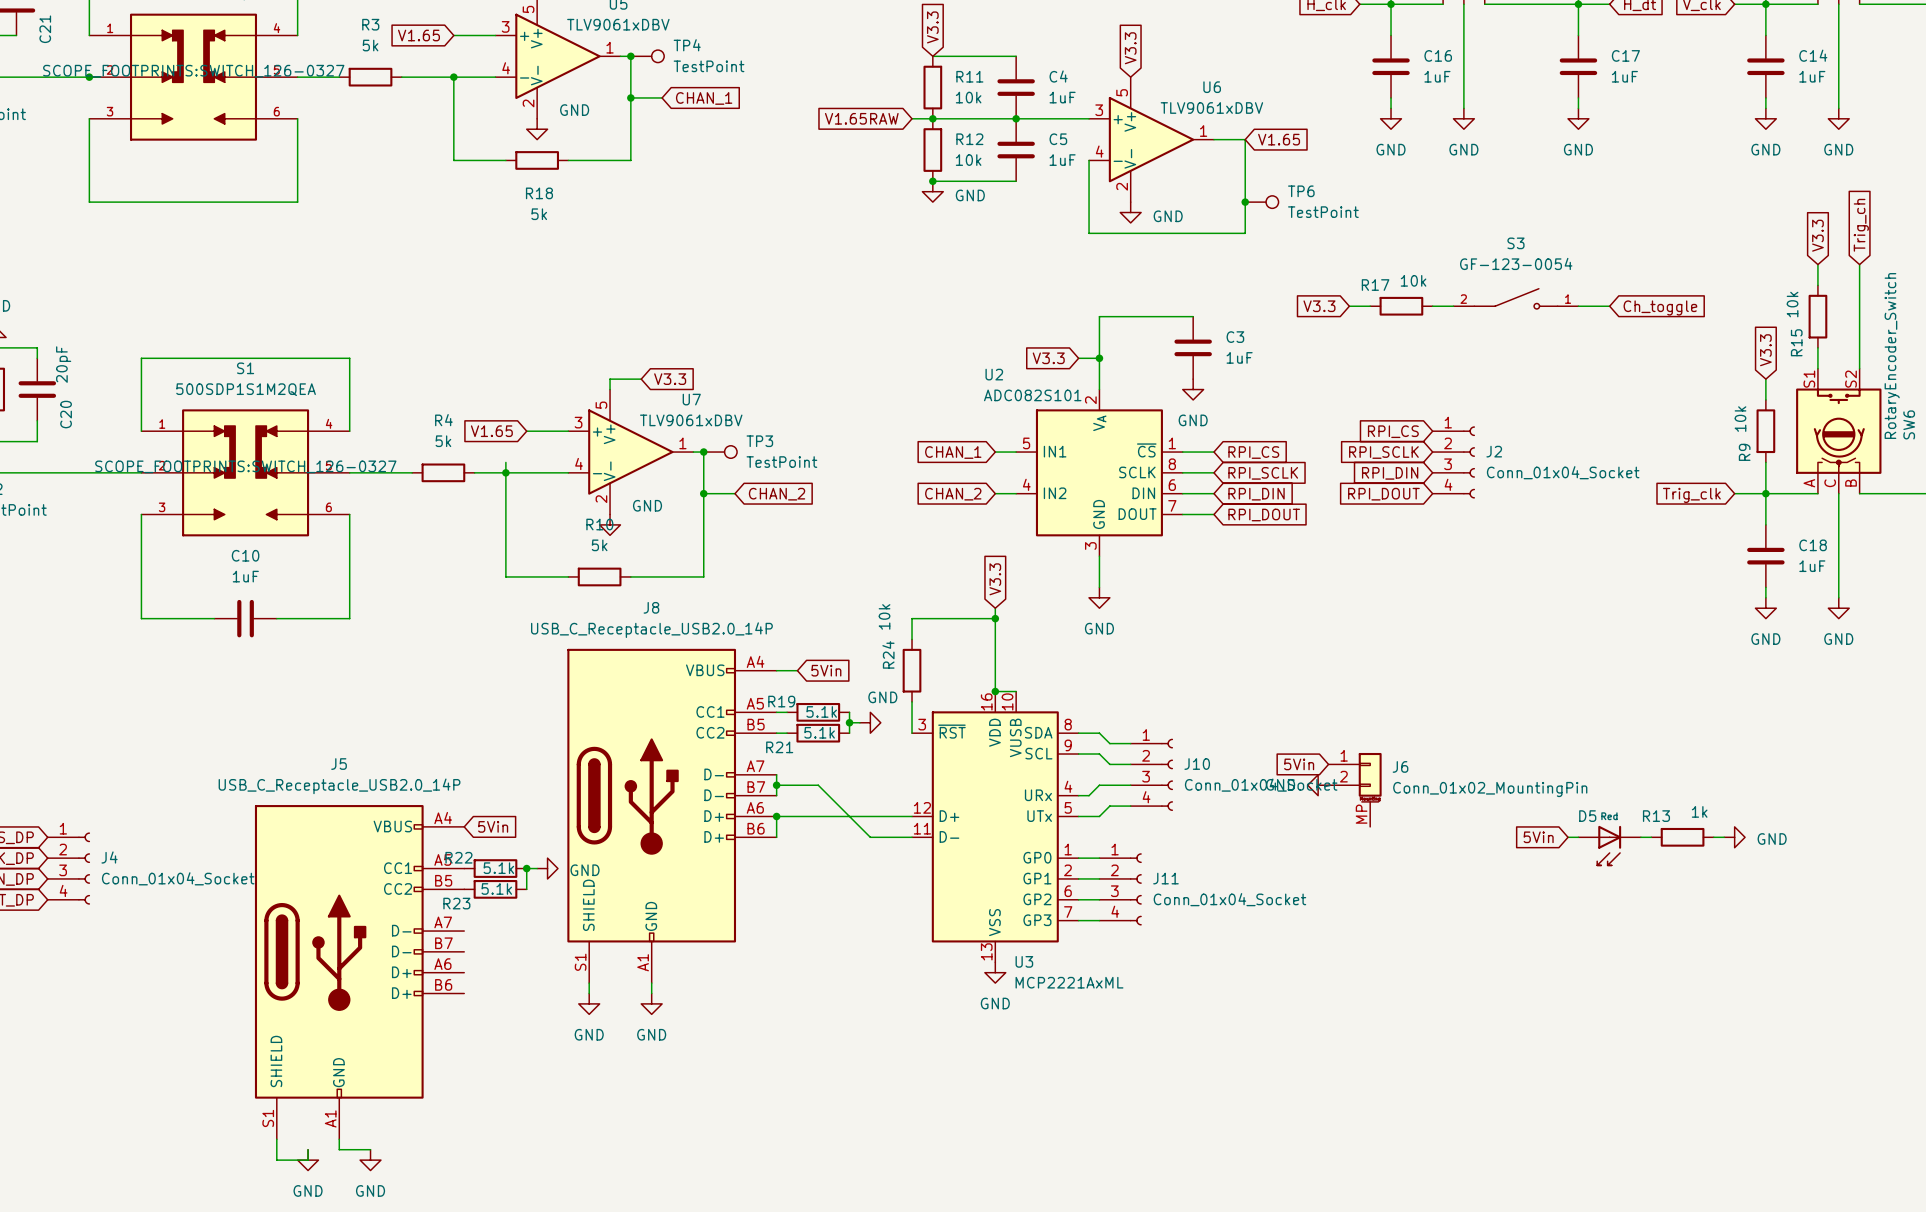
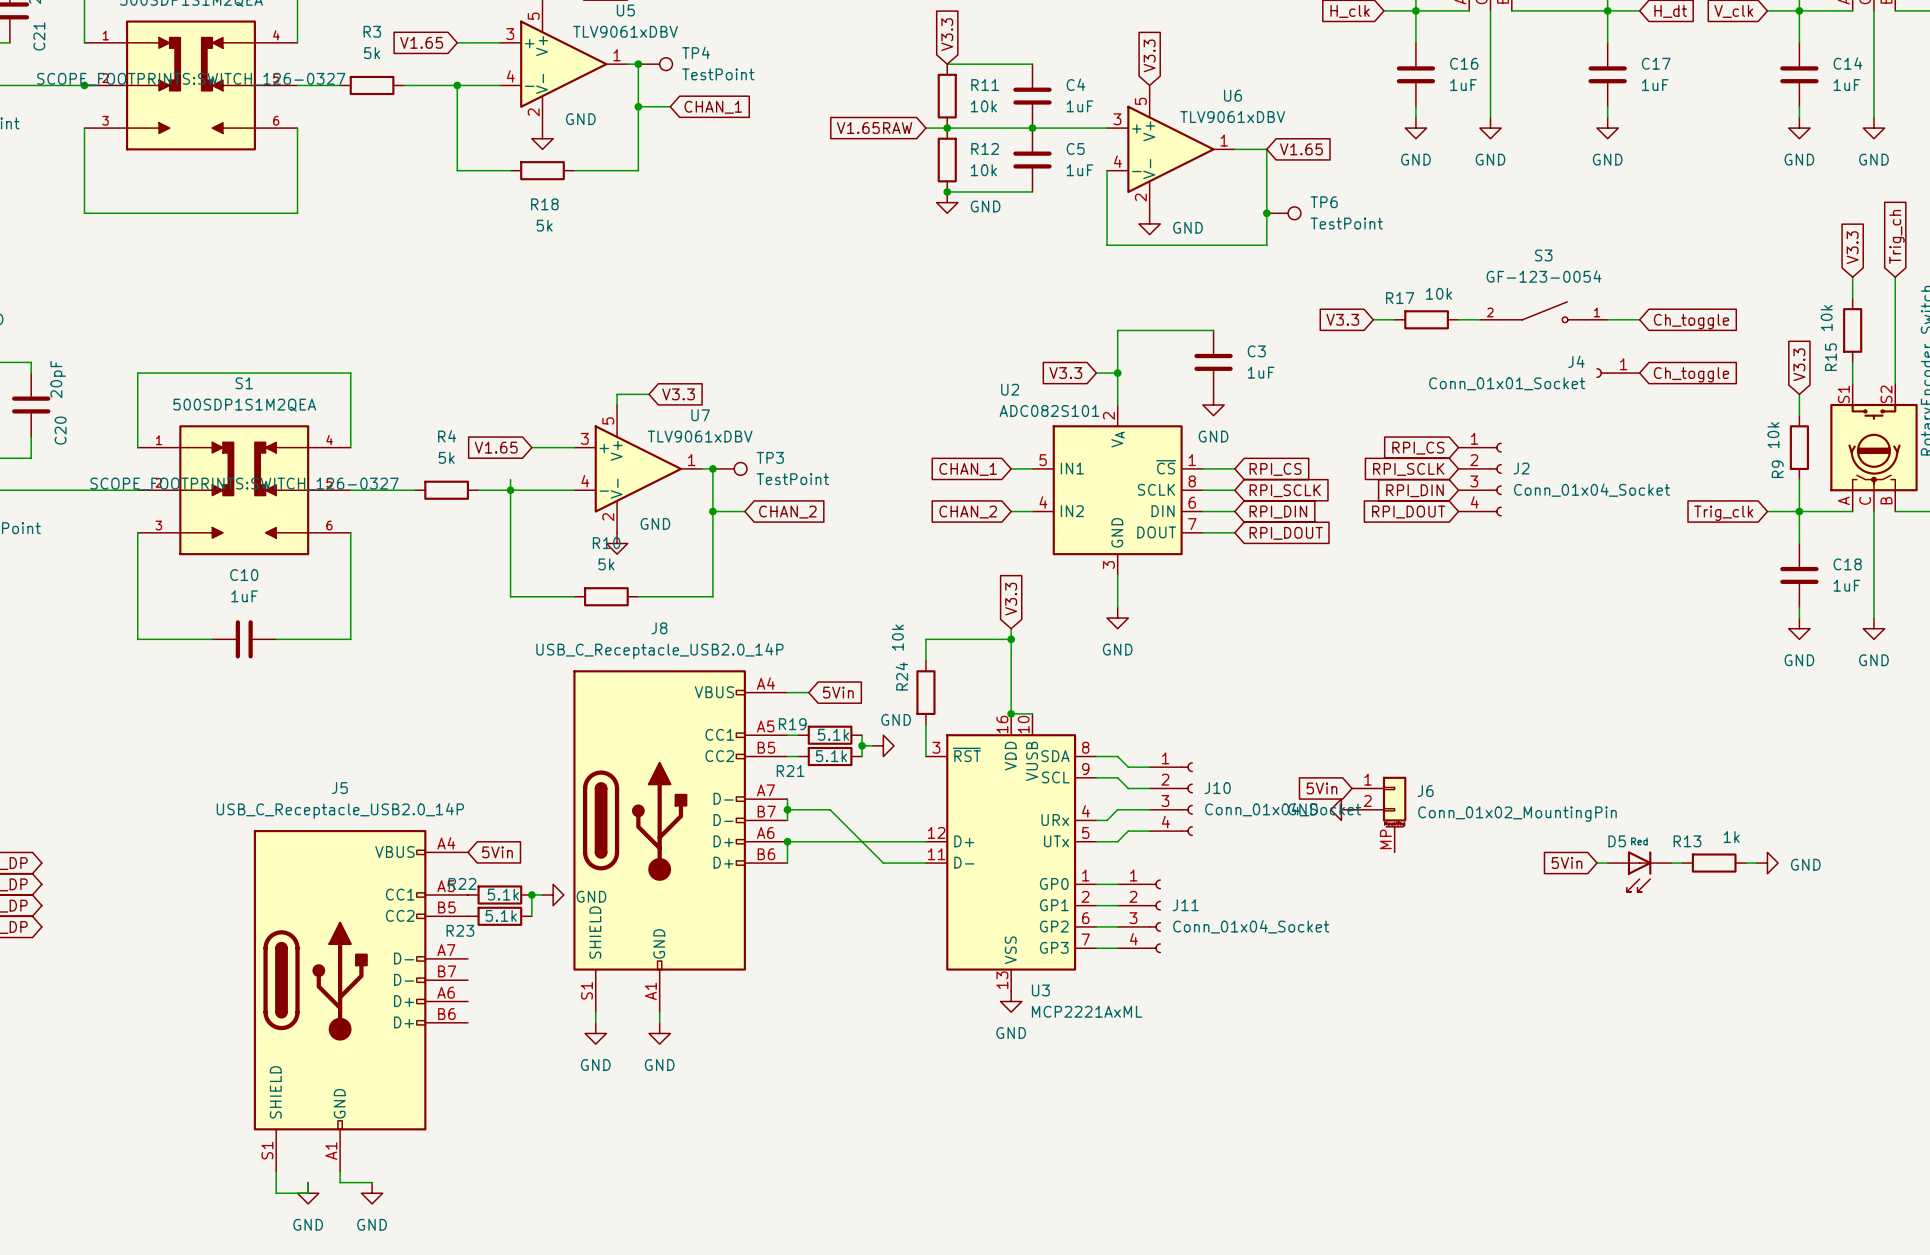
global label: none -> Ch_toggle (1691, 374)
J4 symbol: [47, 832, 90, 905] -> [1596, 368, 1640, 378]
J4 name position: J4 (109, 857) -> J4 (1576, 361)
J4 value: Conn_01x04_Socket (178, 878) -> Conn_01x01_Socket (1507, 383)

